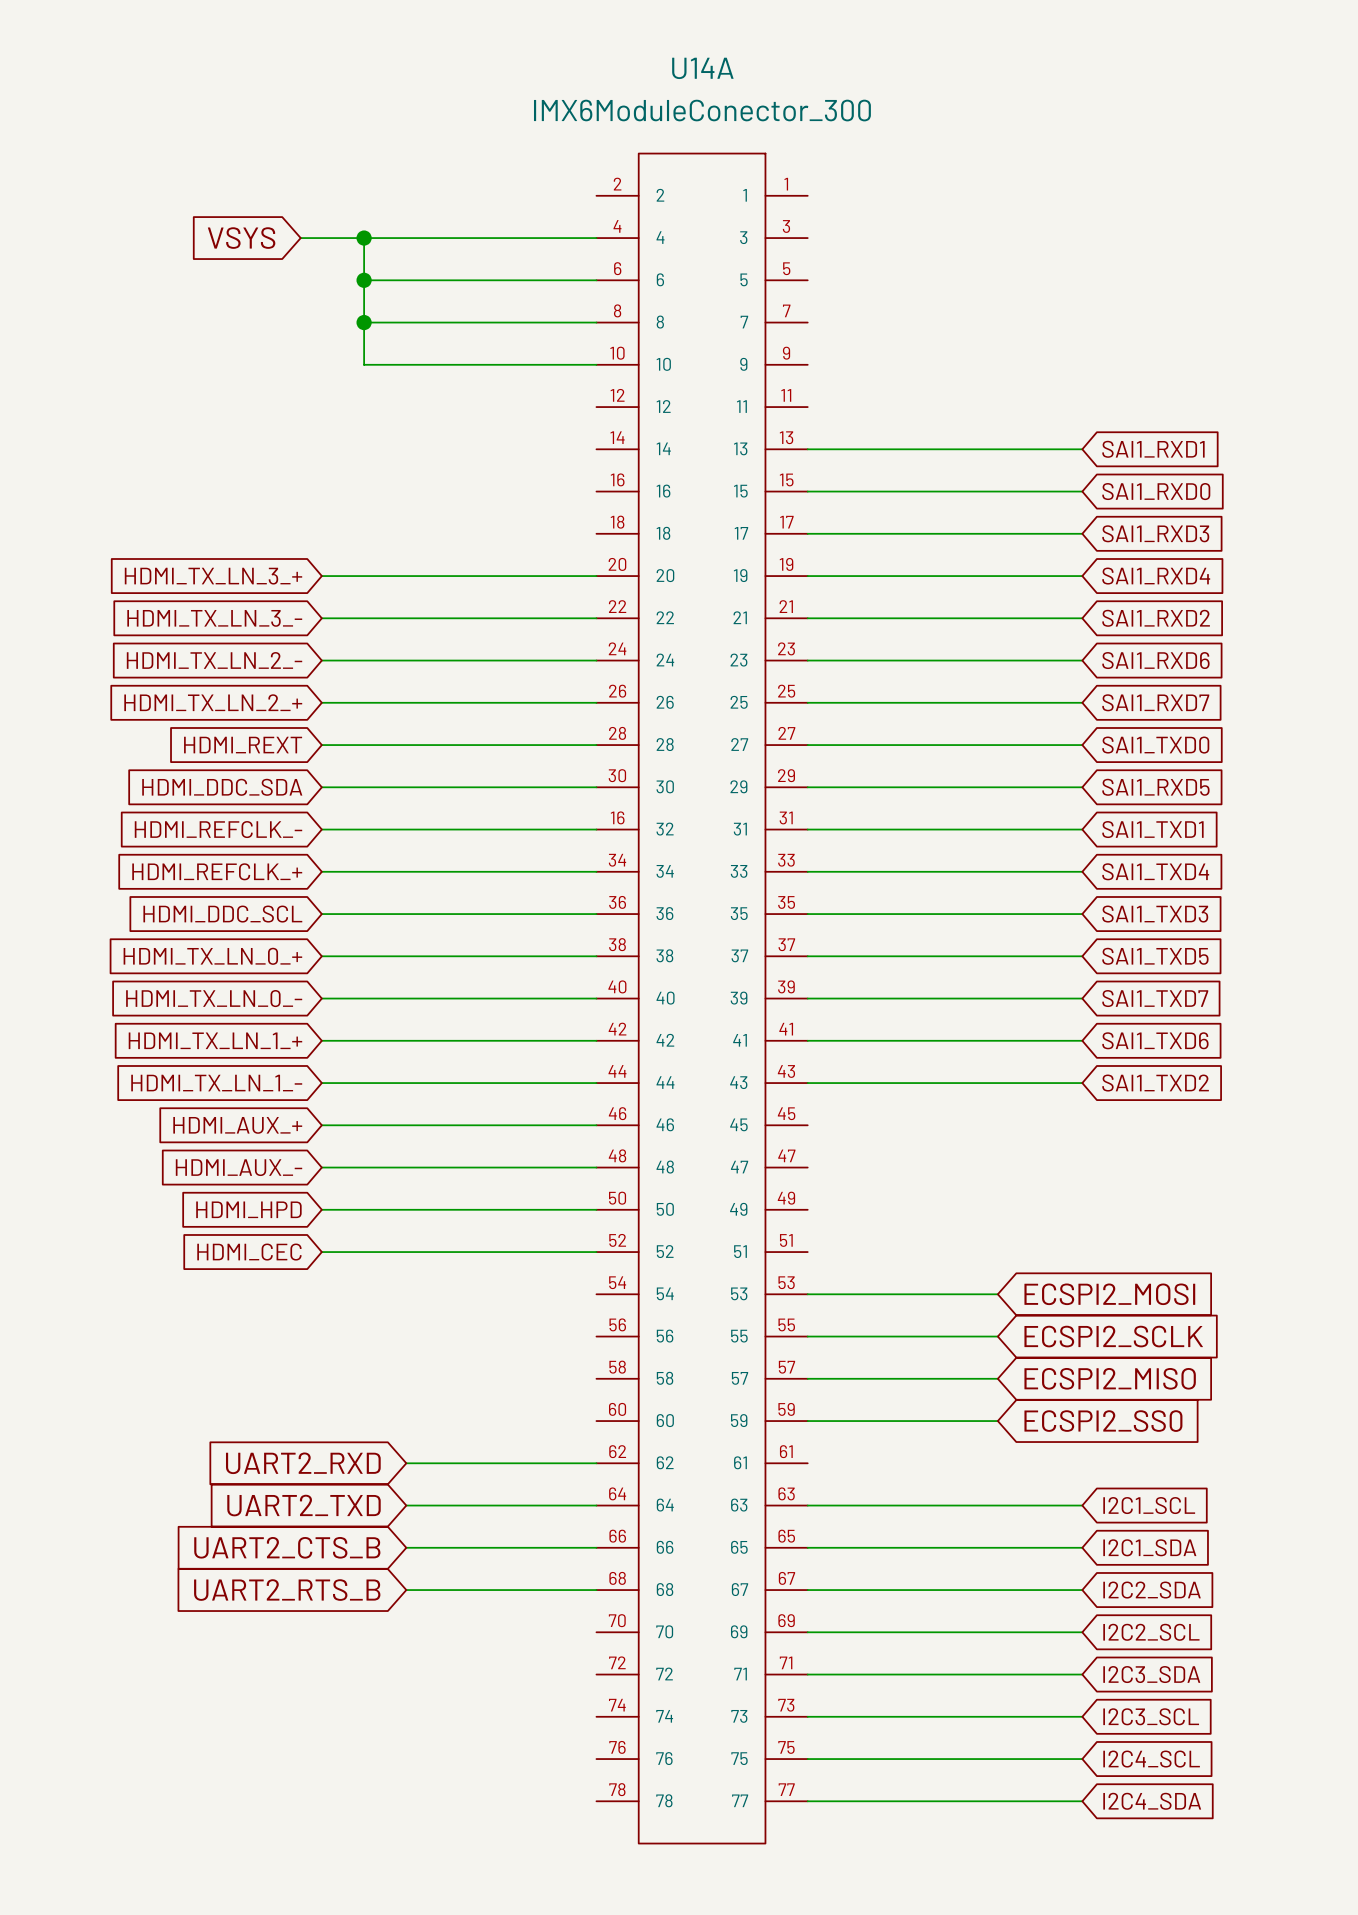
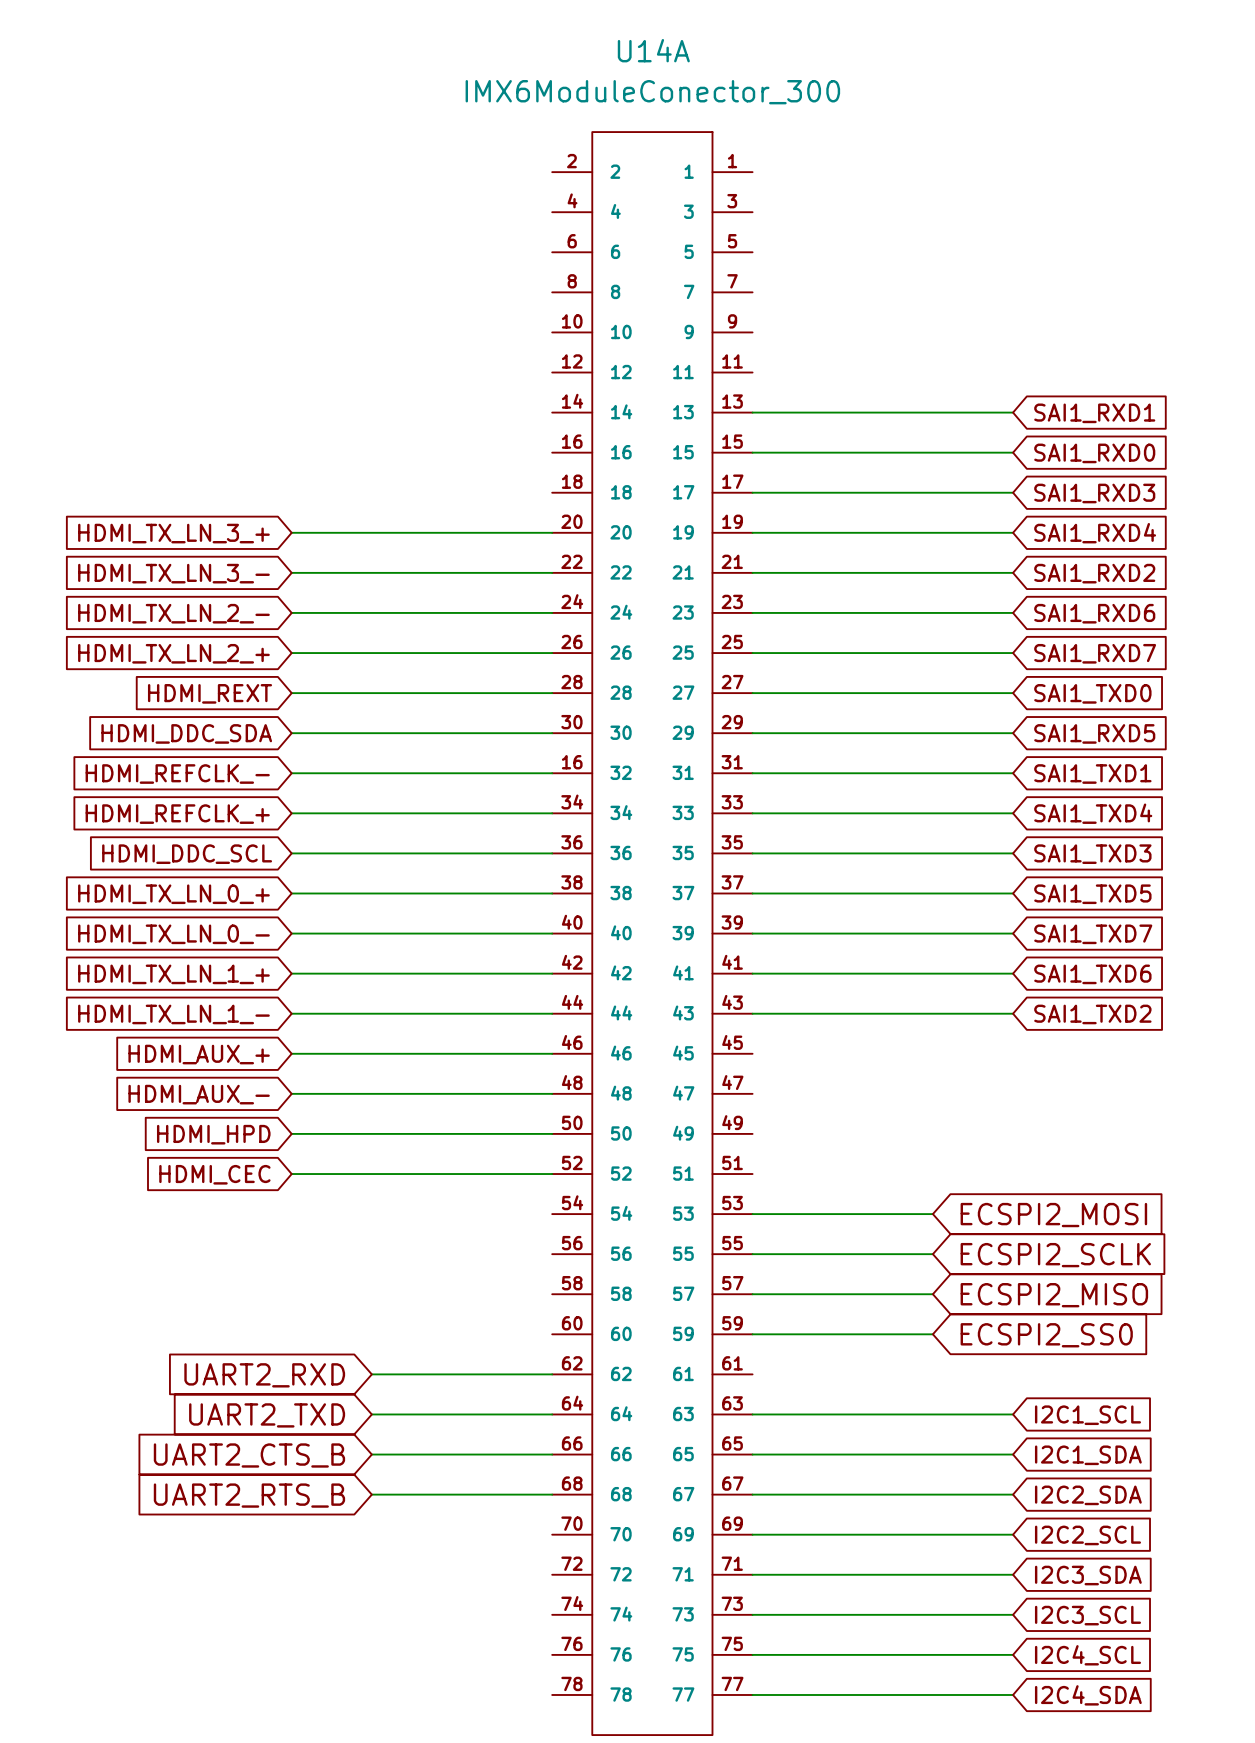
global label: VSYS (241, 238) -> none
wire: (300, 238) (596, 238) -> none
wire: (364, 238) (364, 364) (596, 364) -> none
junction: (364, 238) -> none
wire: (364, 280) (596, 280) -> none
junction: (364, 280) -> none
wire: (364, 322) (596, 322) -> none
junction: (364, 322) -> none

